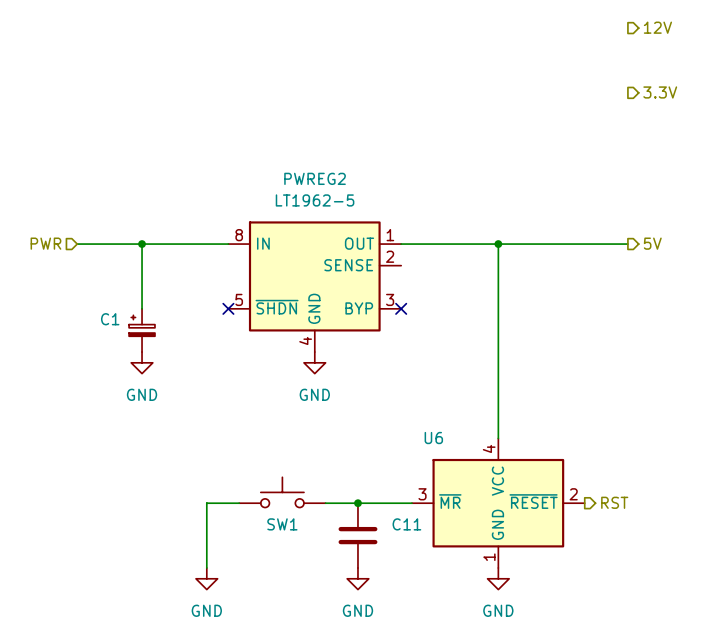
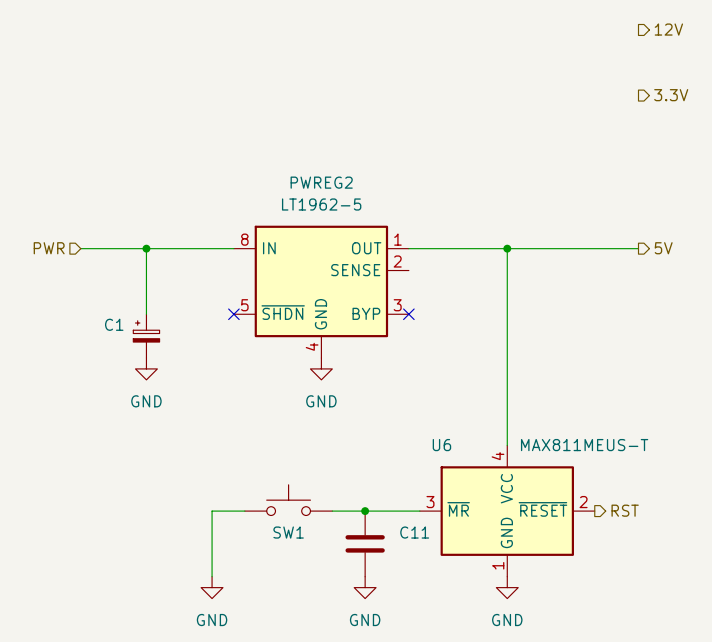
U6 value: none -> MAX811MEUS-T (584, 445)

